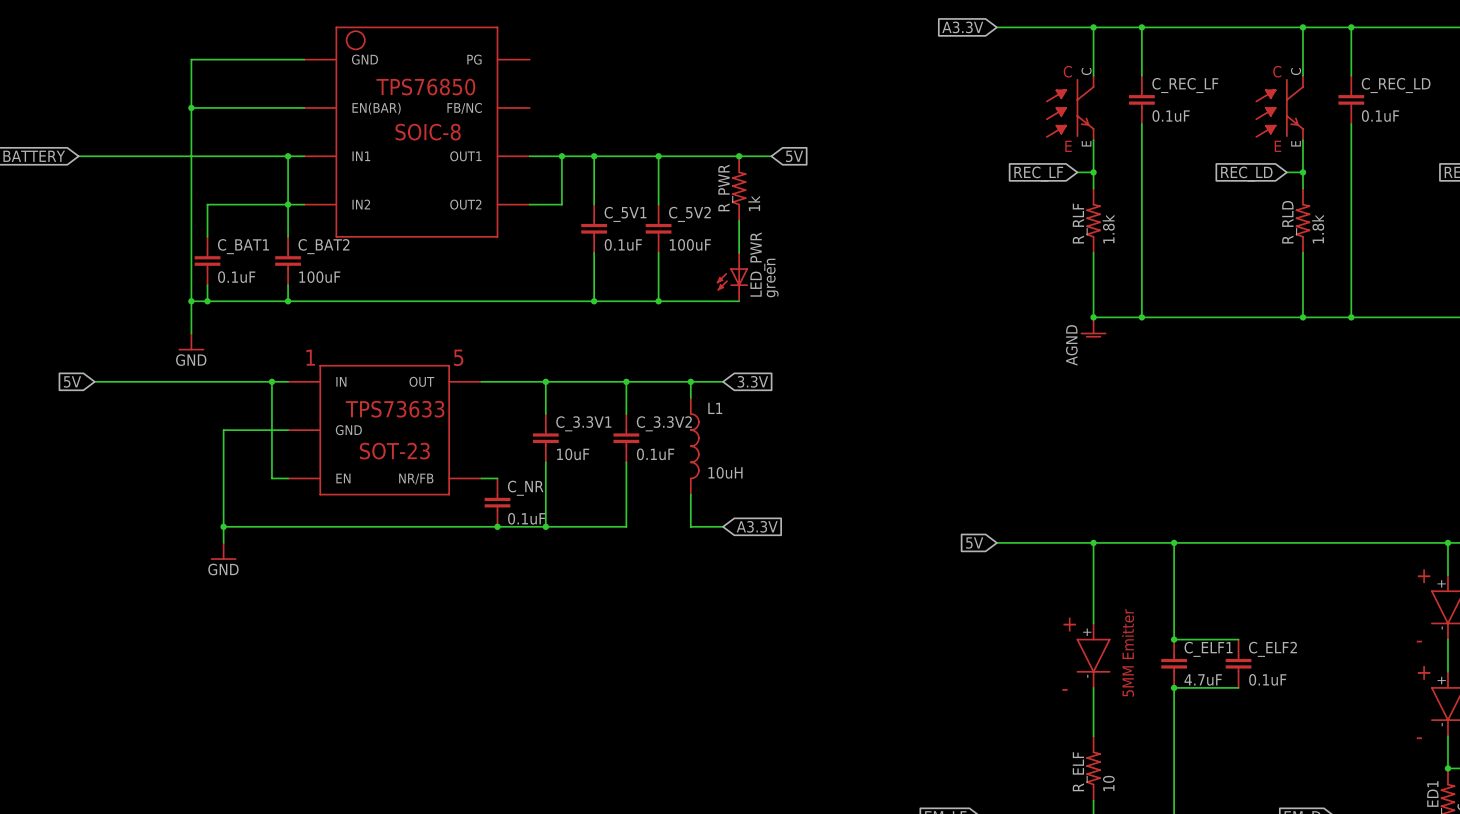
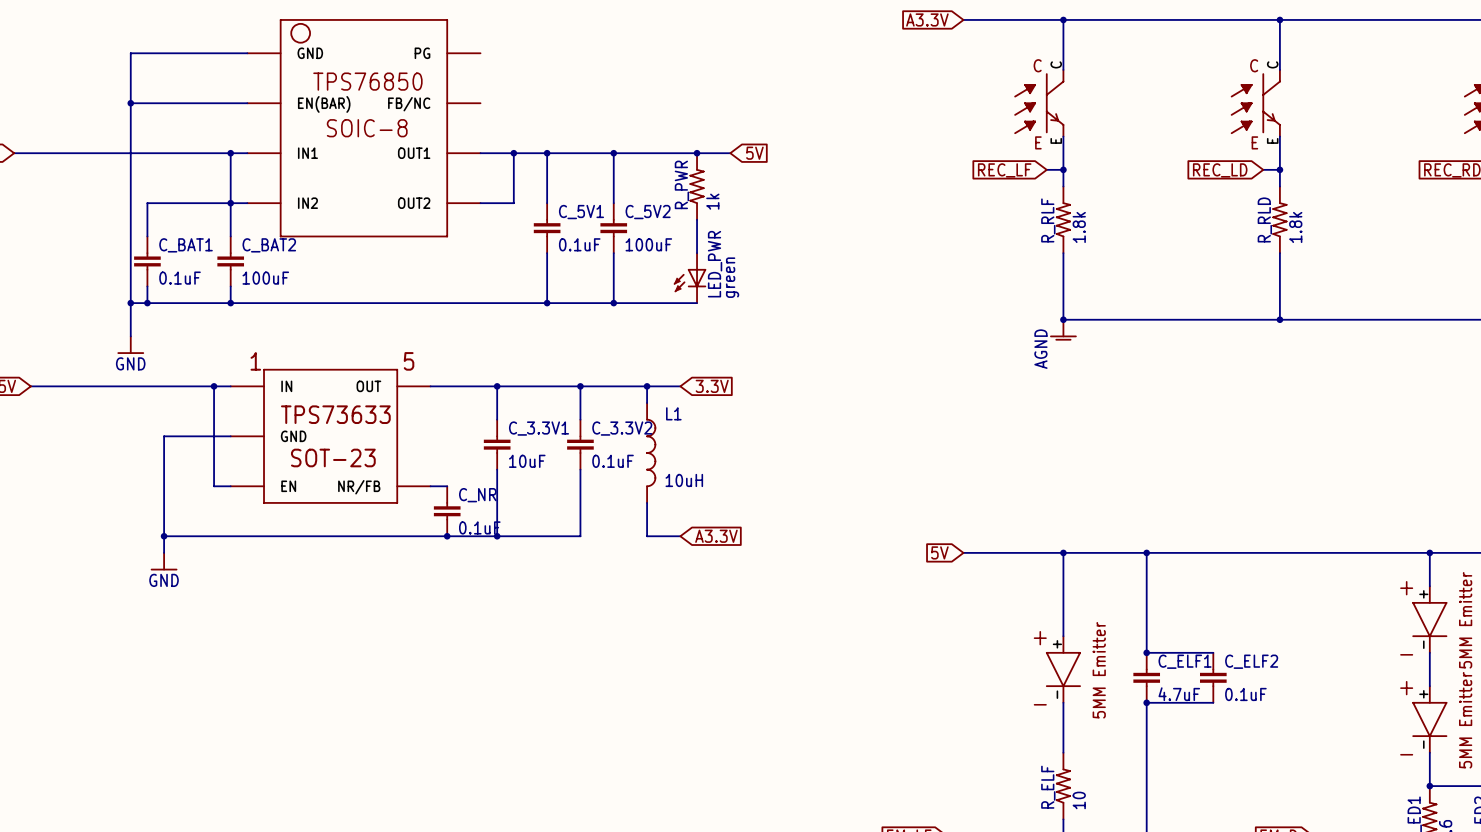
wire: (1141, 27) (1141, 75) -> none
junction: (1141, 27) -> none
wire: (1351, 27) (1351, 75) -> none
junction: (1351, 27) -> none
C_REC_LF: 0.1uF (1141, 99) -> none
C_REC_LD: 0.1uF (1351, 99) -> none
wire: (1141, 124) (1141, 317) -> none
wire: (1351, 124) (1351, 317) -> none
junction: (1141, 317) -> none
junction: (1351, 317) -> none

